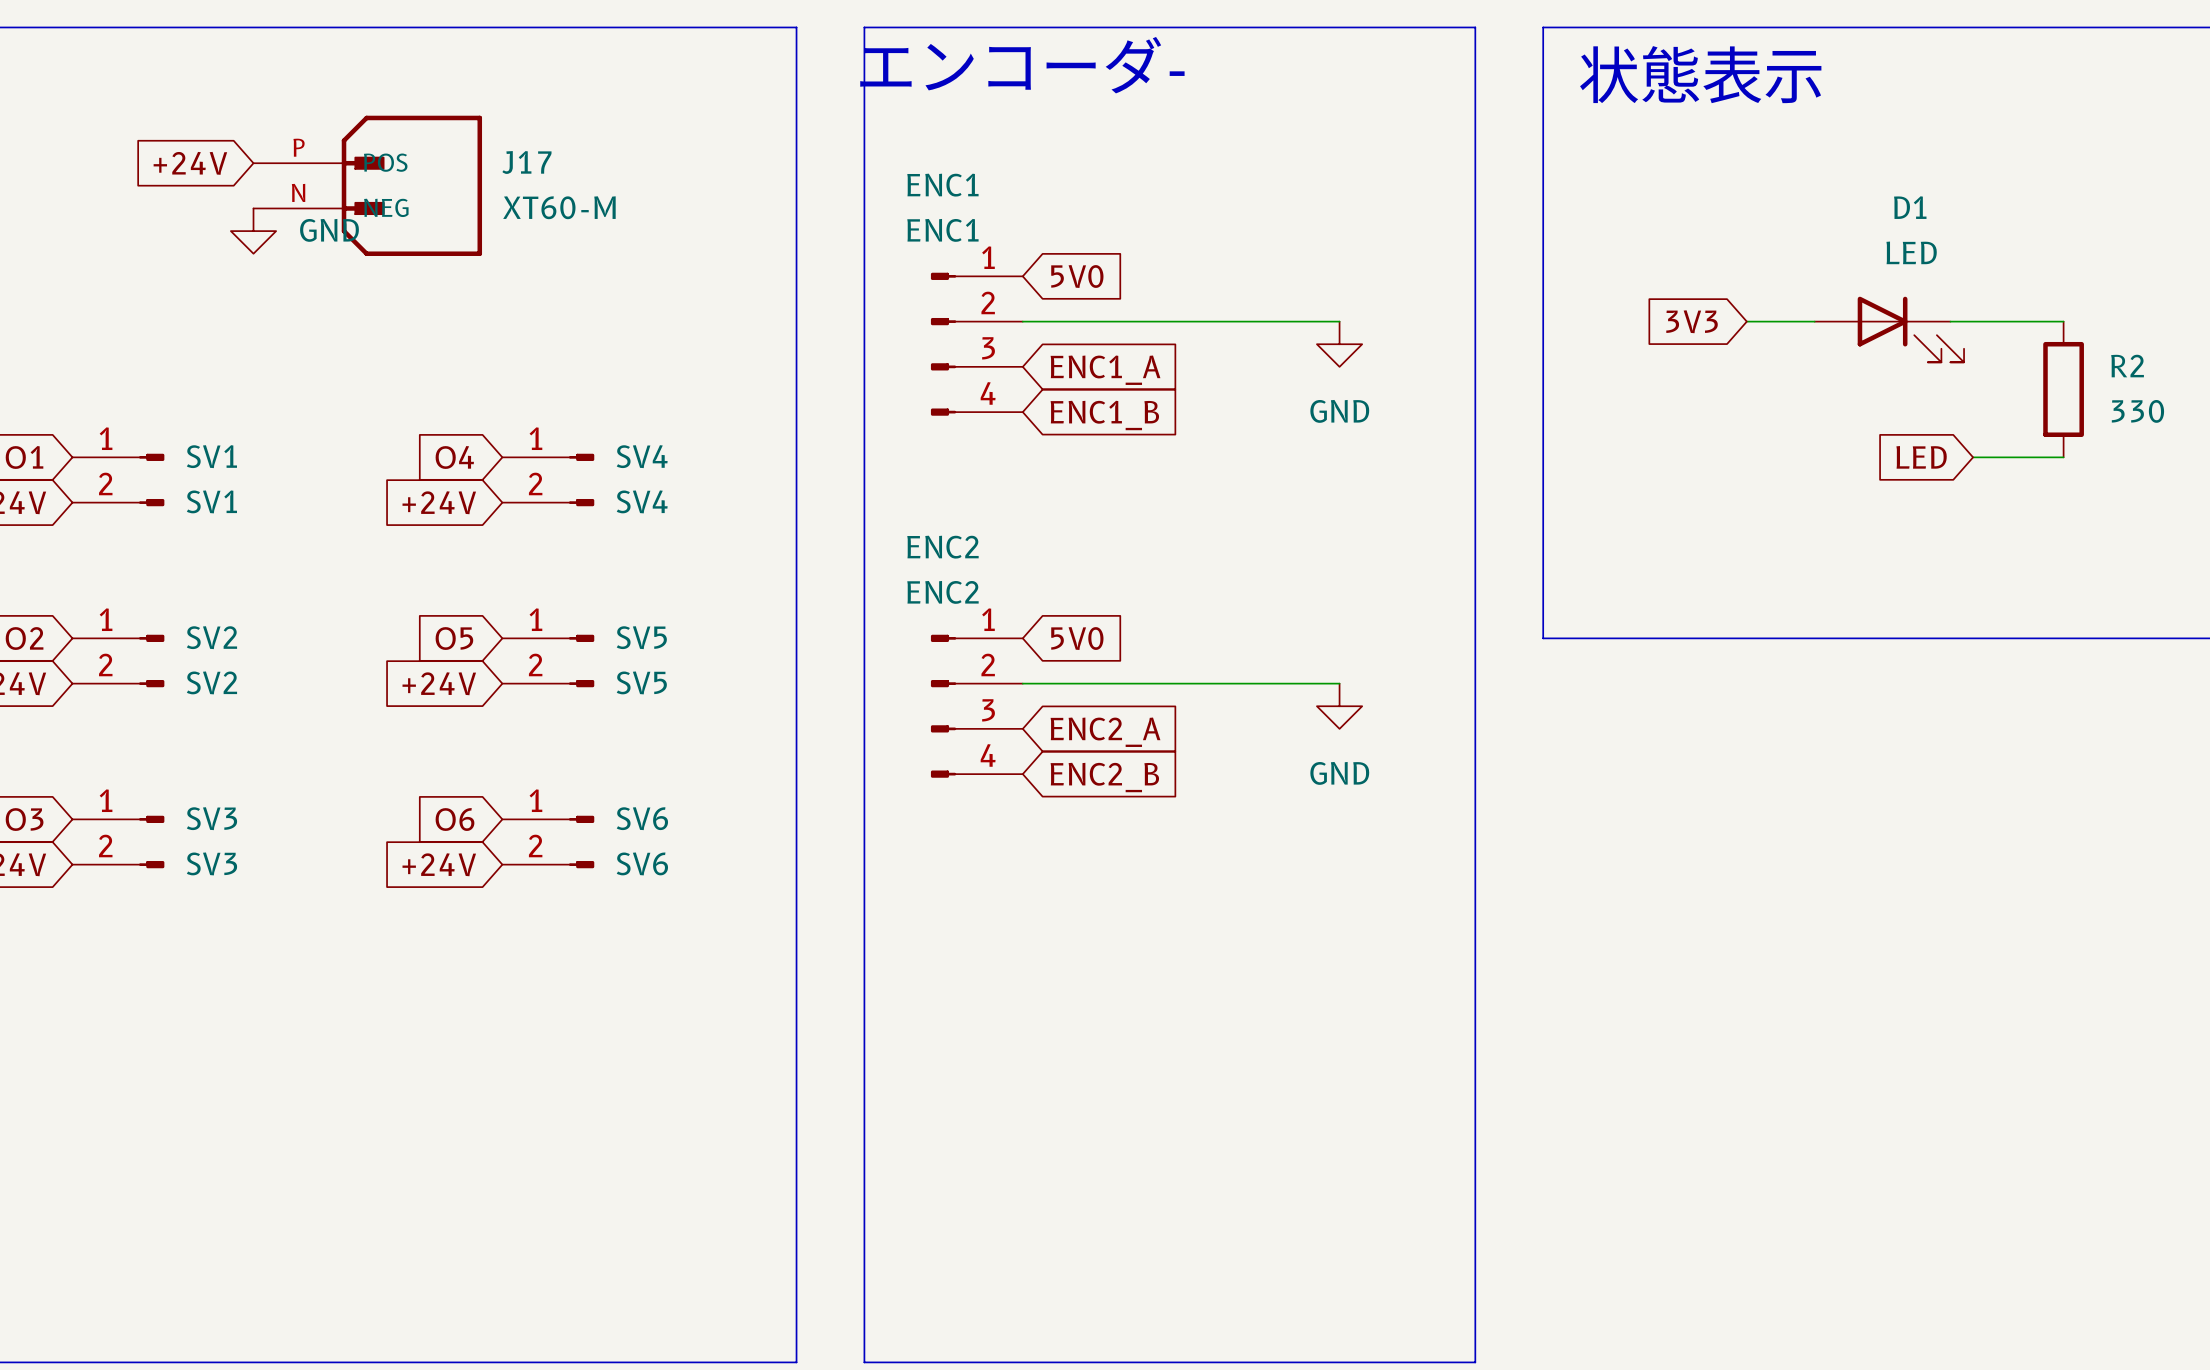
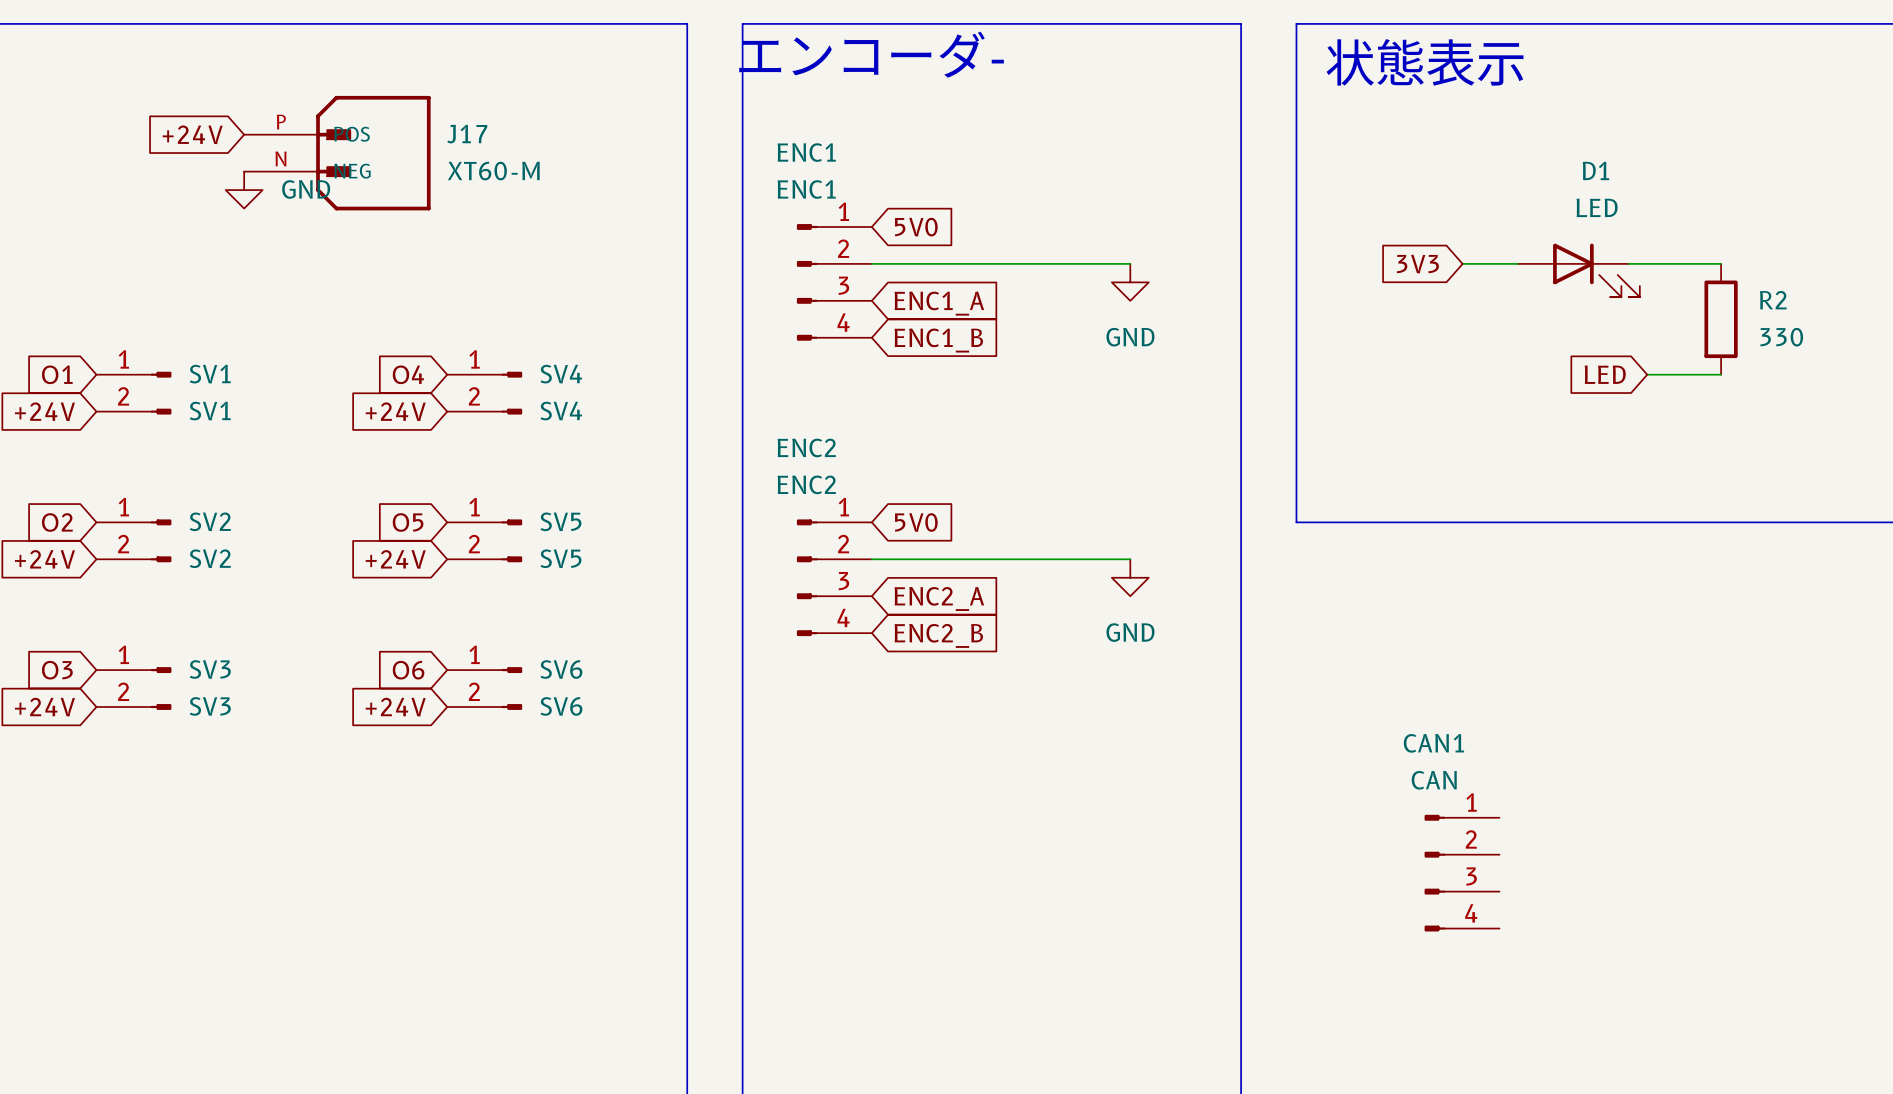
CAN1: none -> CAN (1462, 873)

